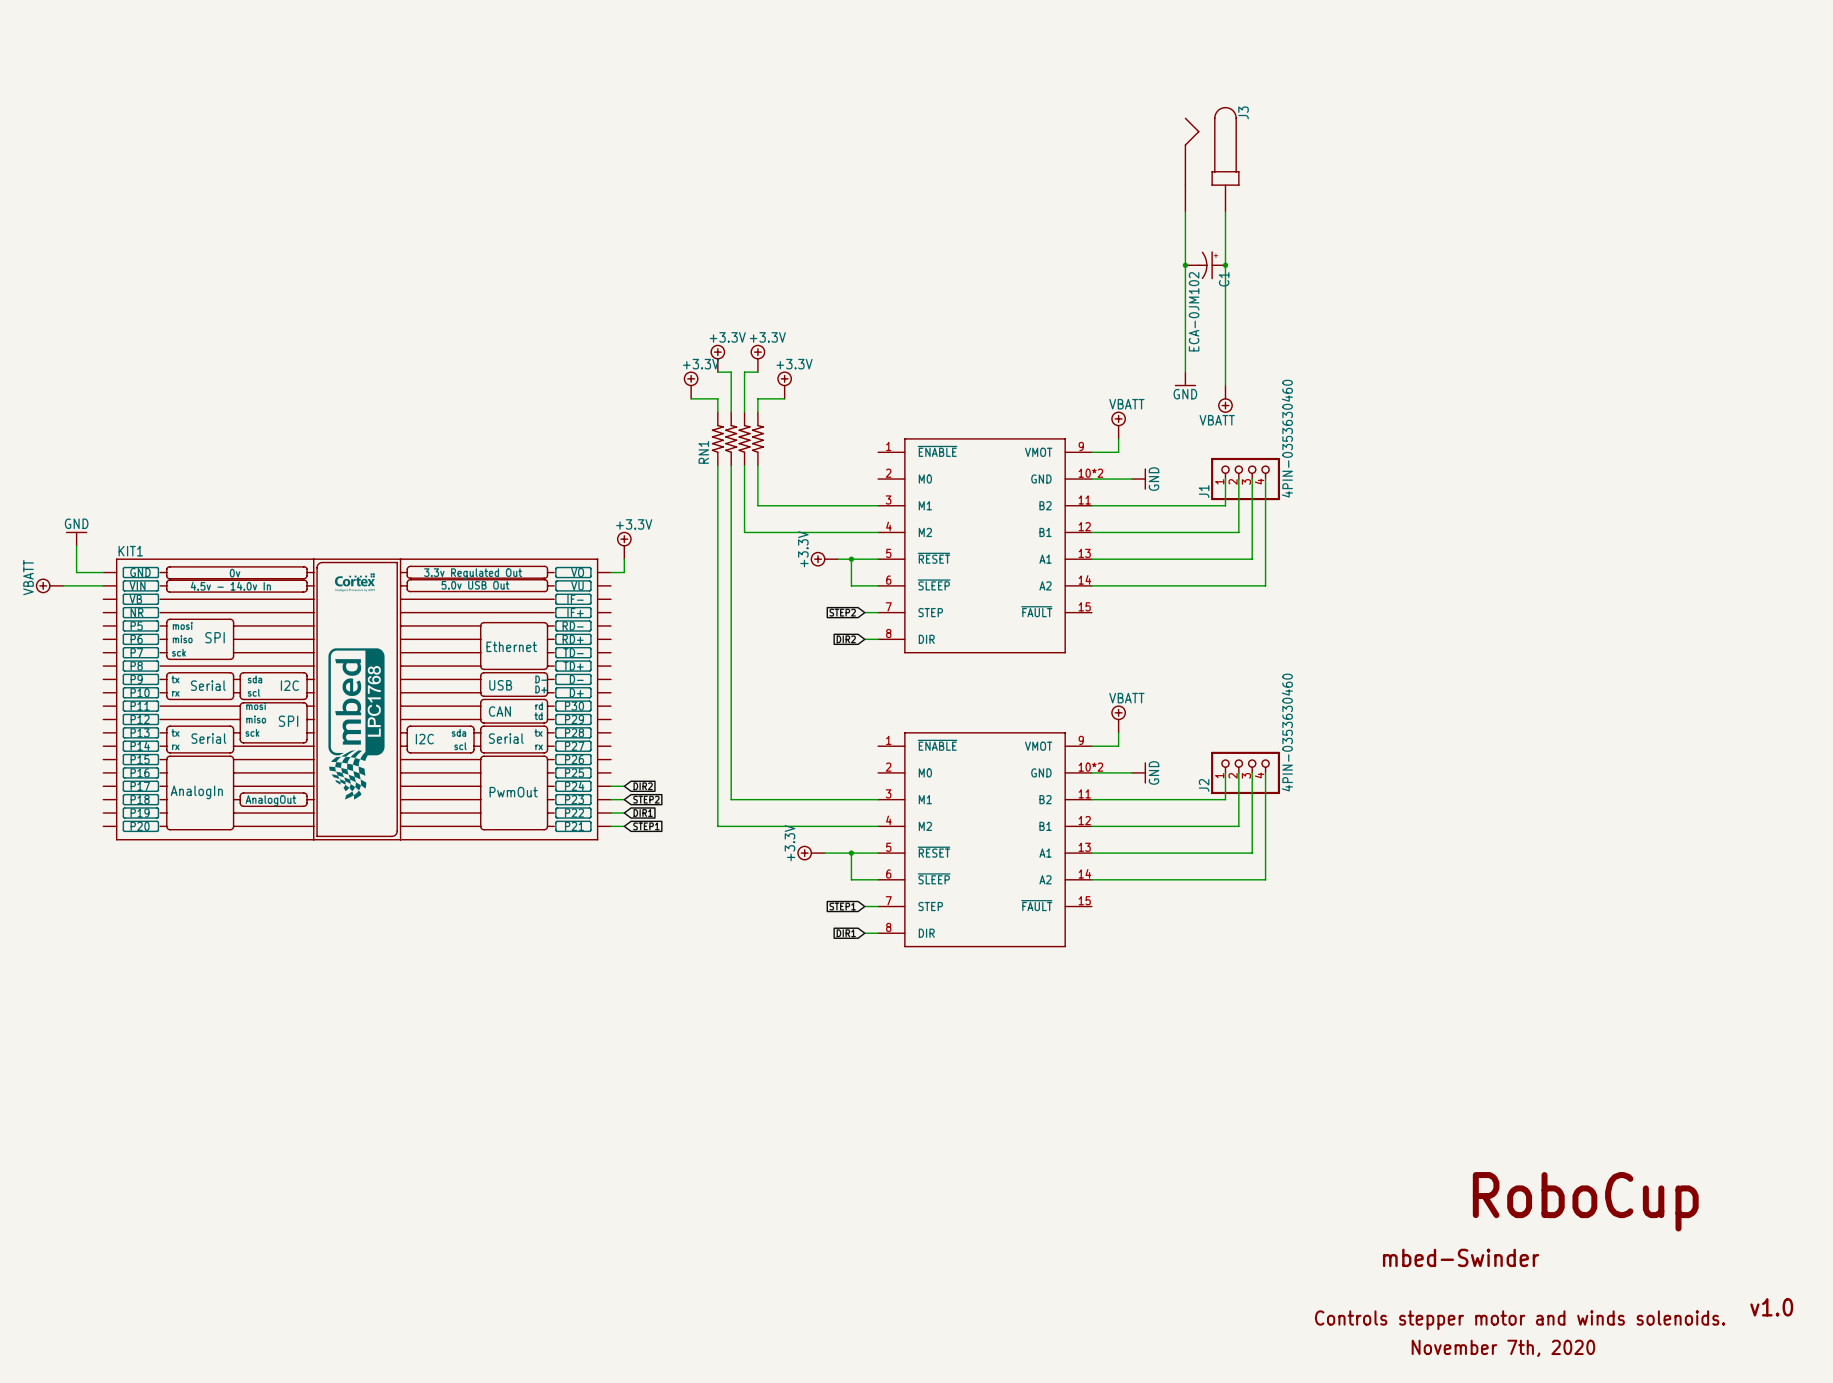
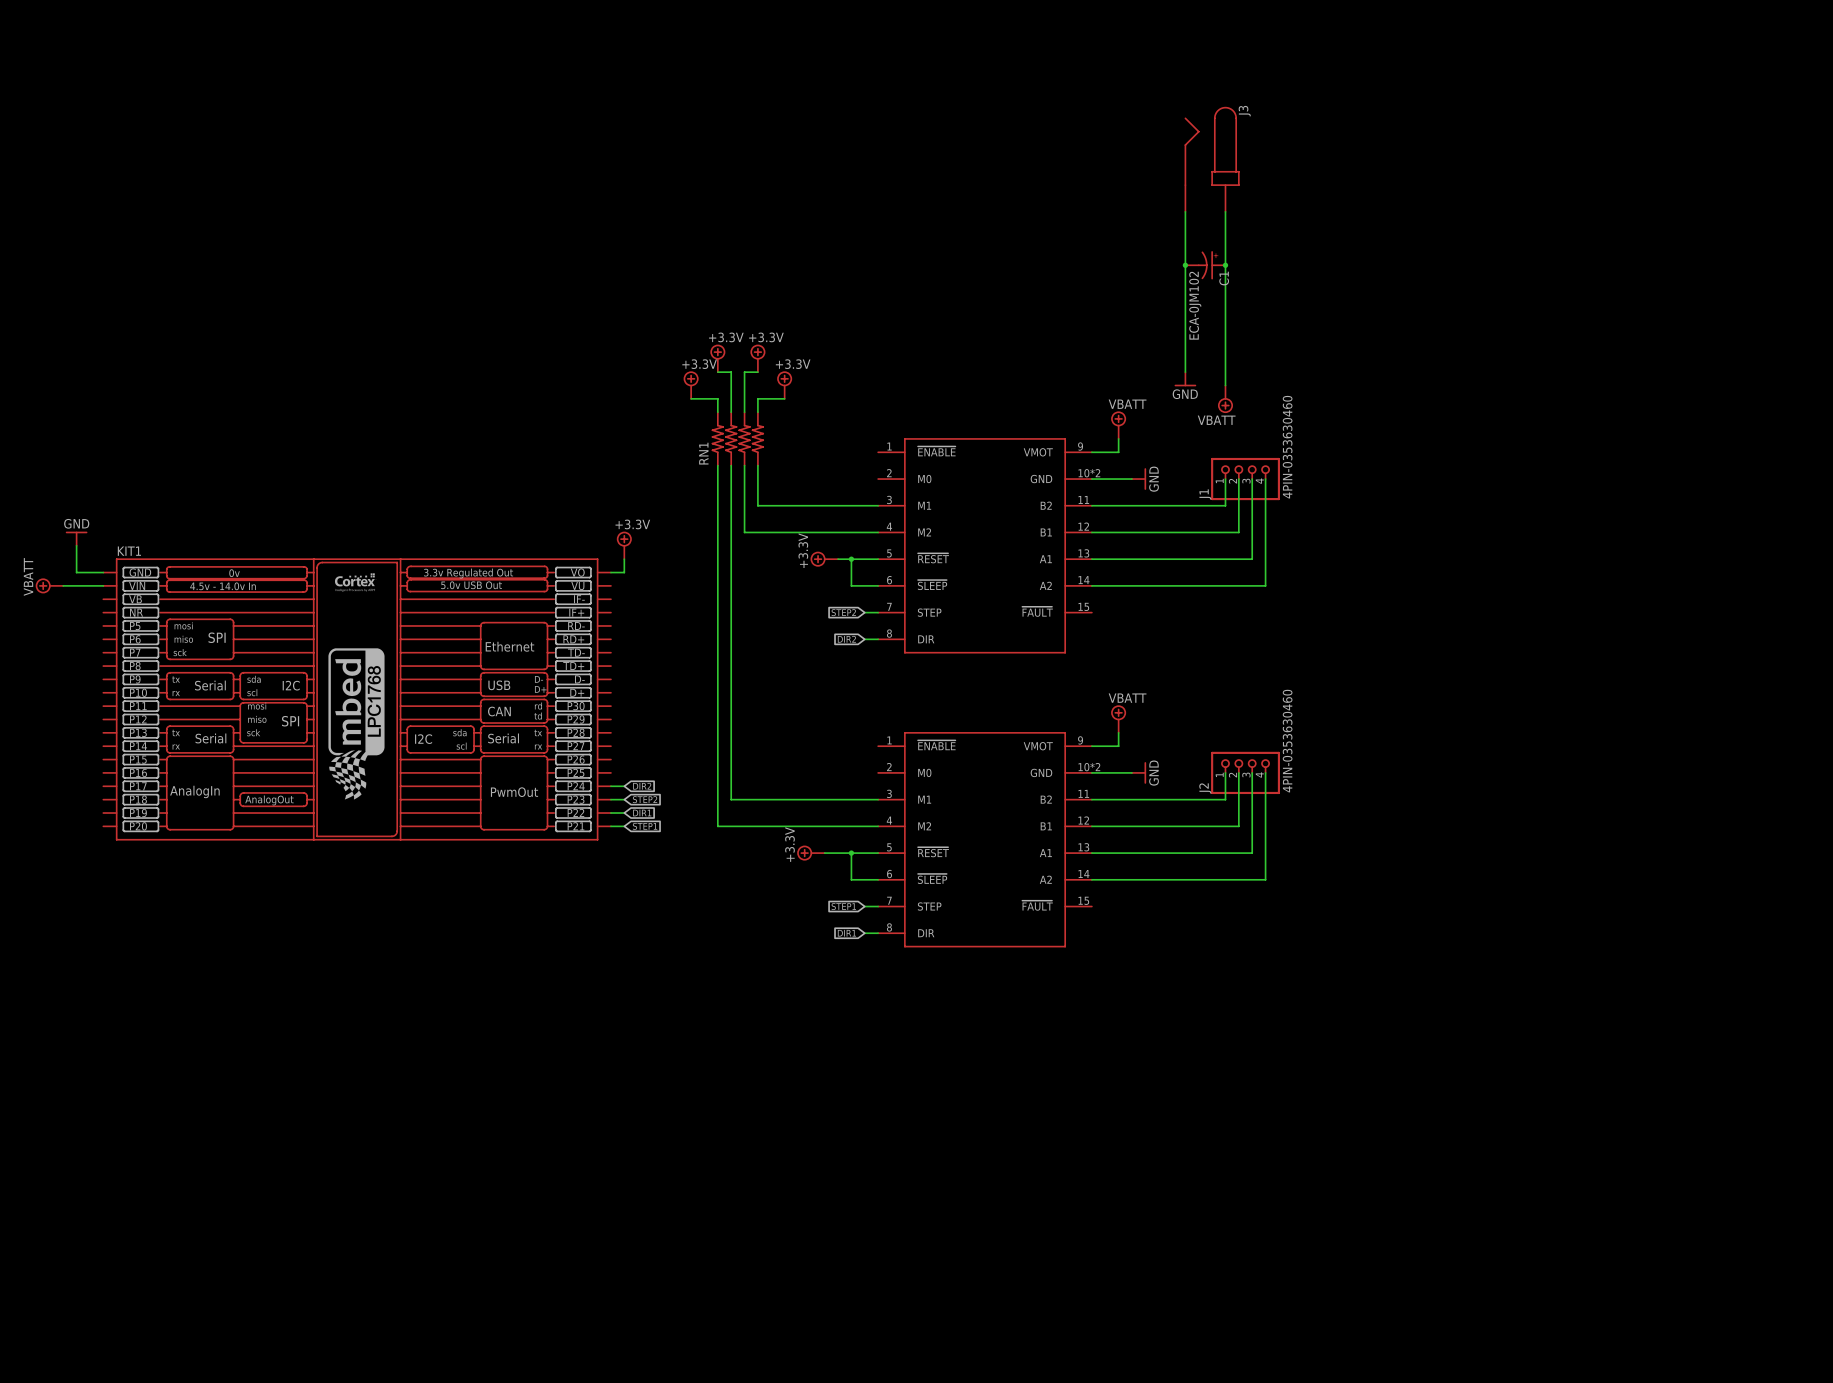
text: RoboCup (1585, 1201) -> none
text: mbed-Swinder (1461, 1257) -> none
text: v1.0 (1771, 1307) -> none
text: Controls stepper motor and winds solenoids. (1520, 1320) -> none
text: November 7th, 2020 (1503, 1348) -> none

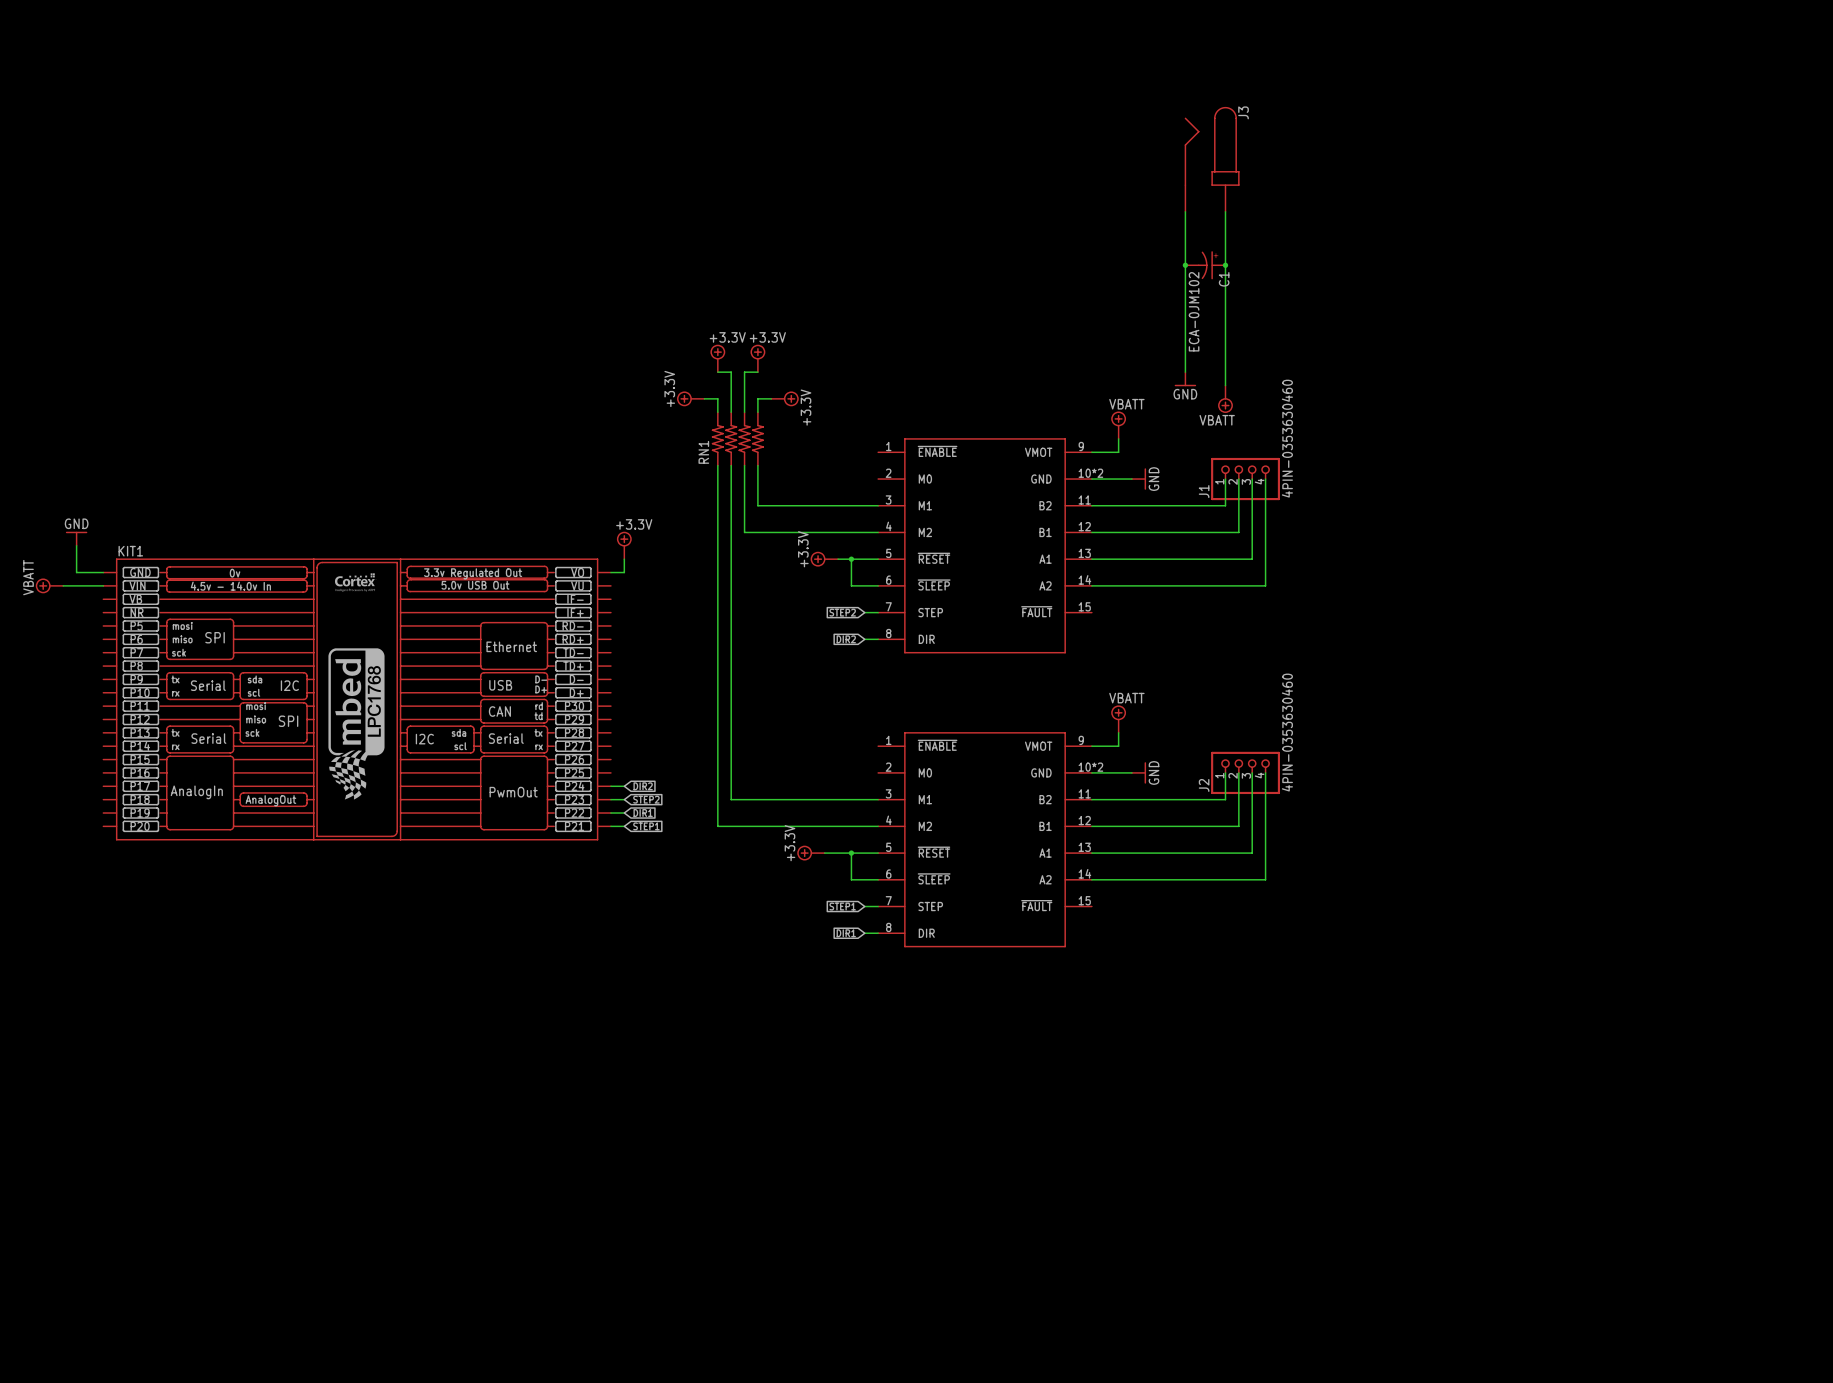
power symbol rotation: 0° (691, 378) -> 90° counterclockwise (684, 398)
power symbol rotation: 0° (784, 378) -> 90° clockwise (791, 398)

